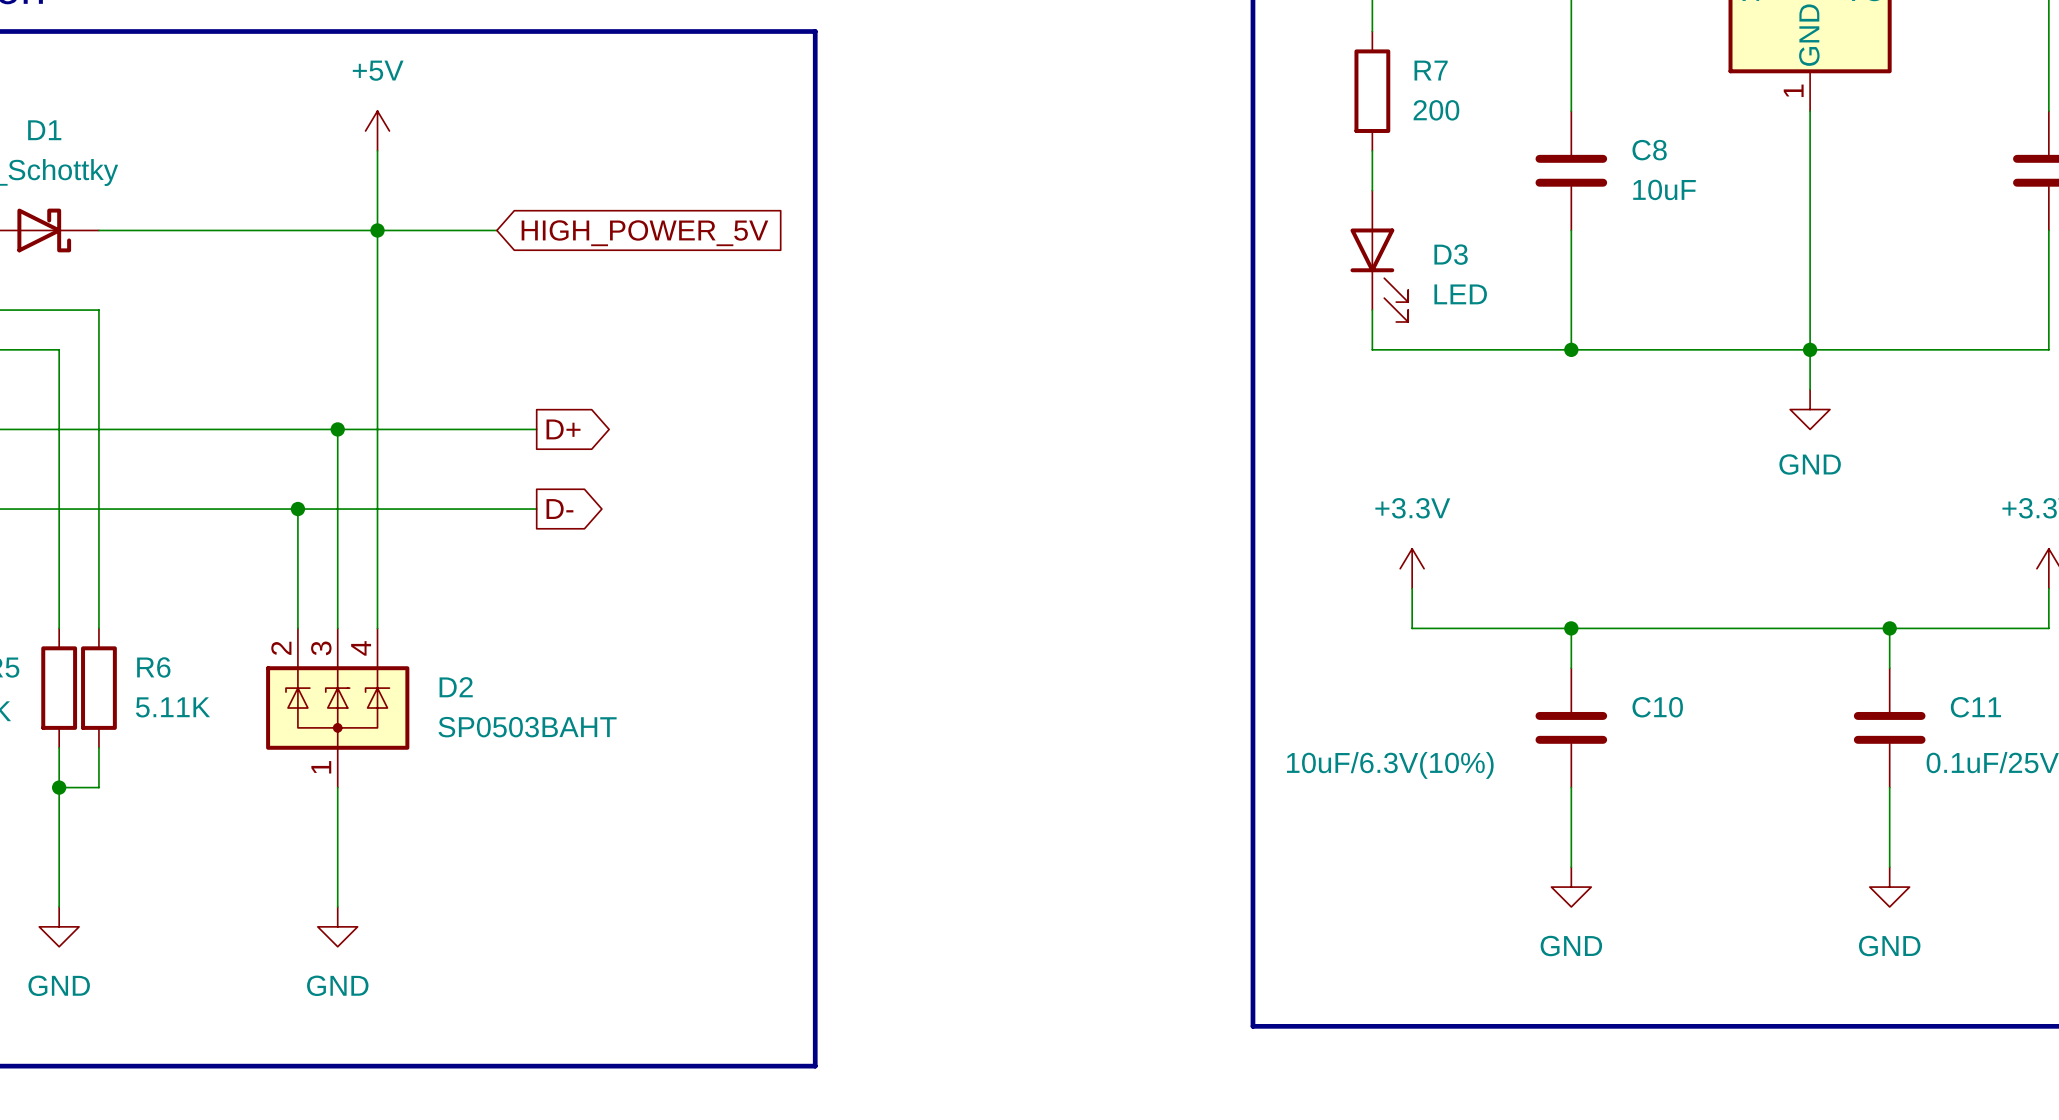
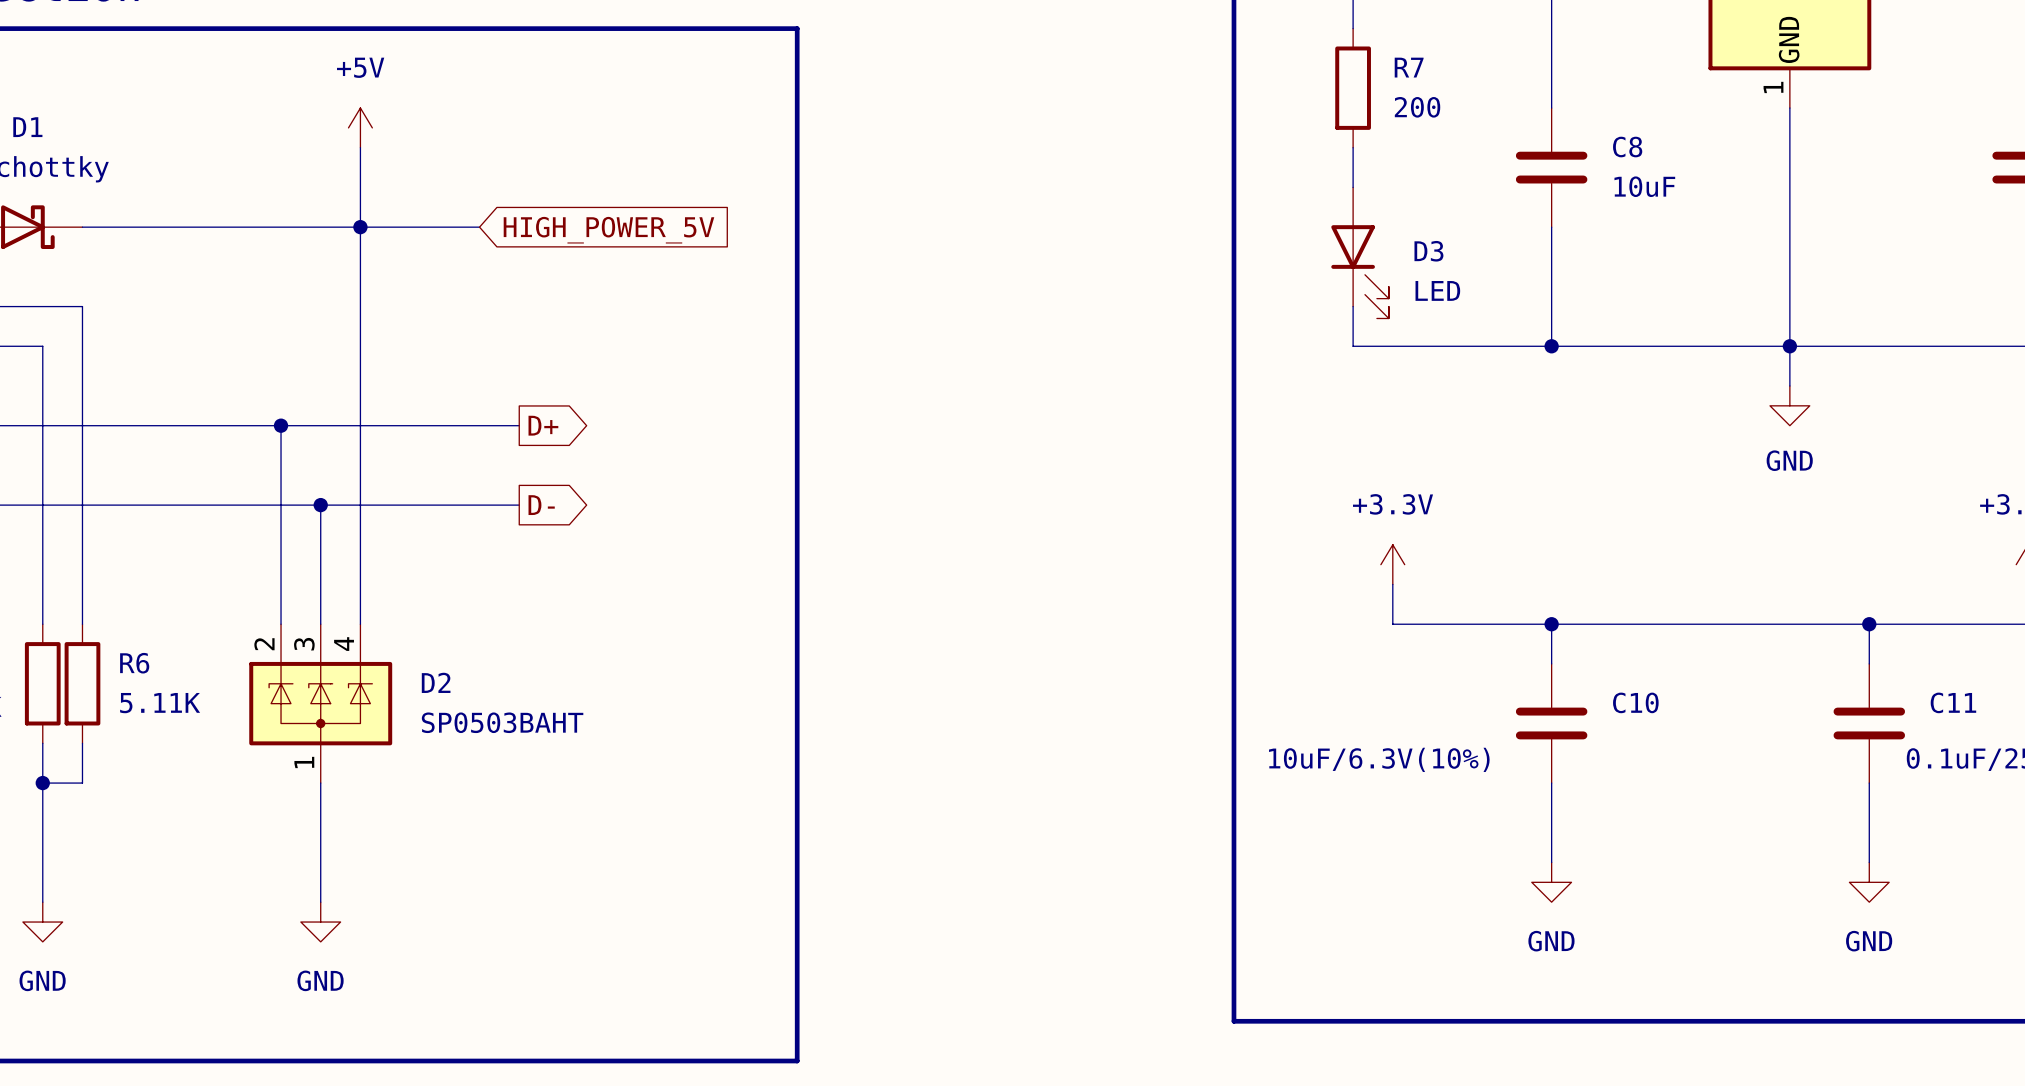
junction: none -> (281, 425)
wire: (337, 429) (337, 509) -> (281, 425) (281, 505)
junction: (337, 429) -> none
junction: (297, 509) -> none
junction: none -> (320, 505)

